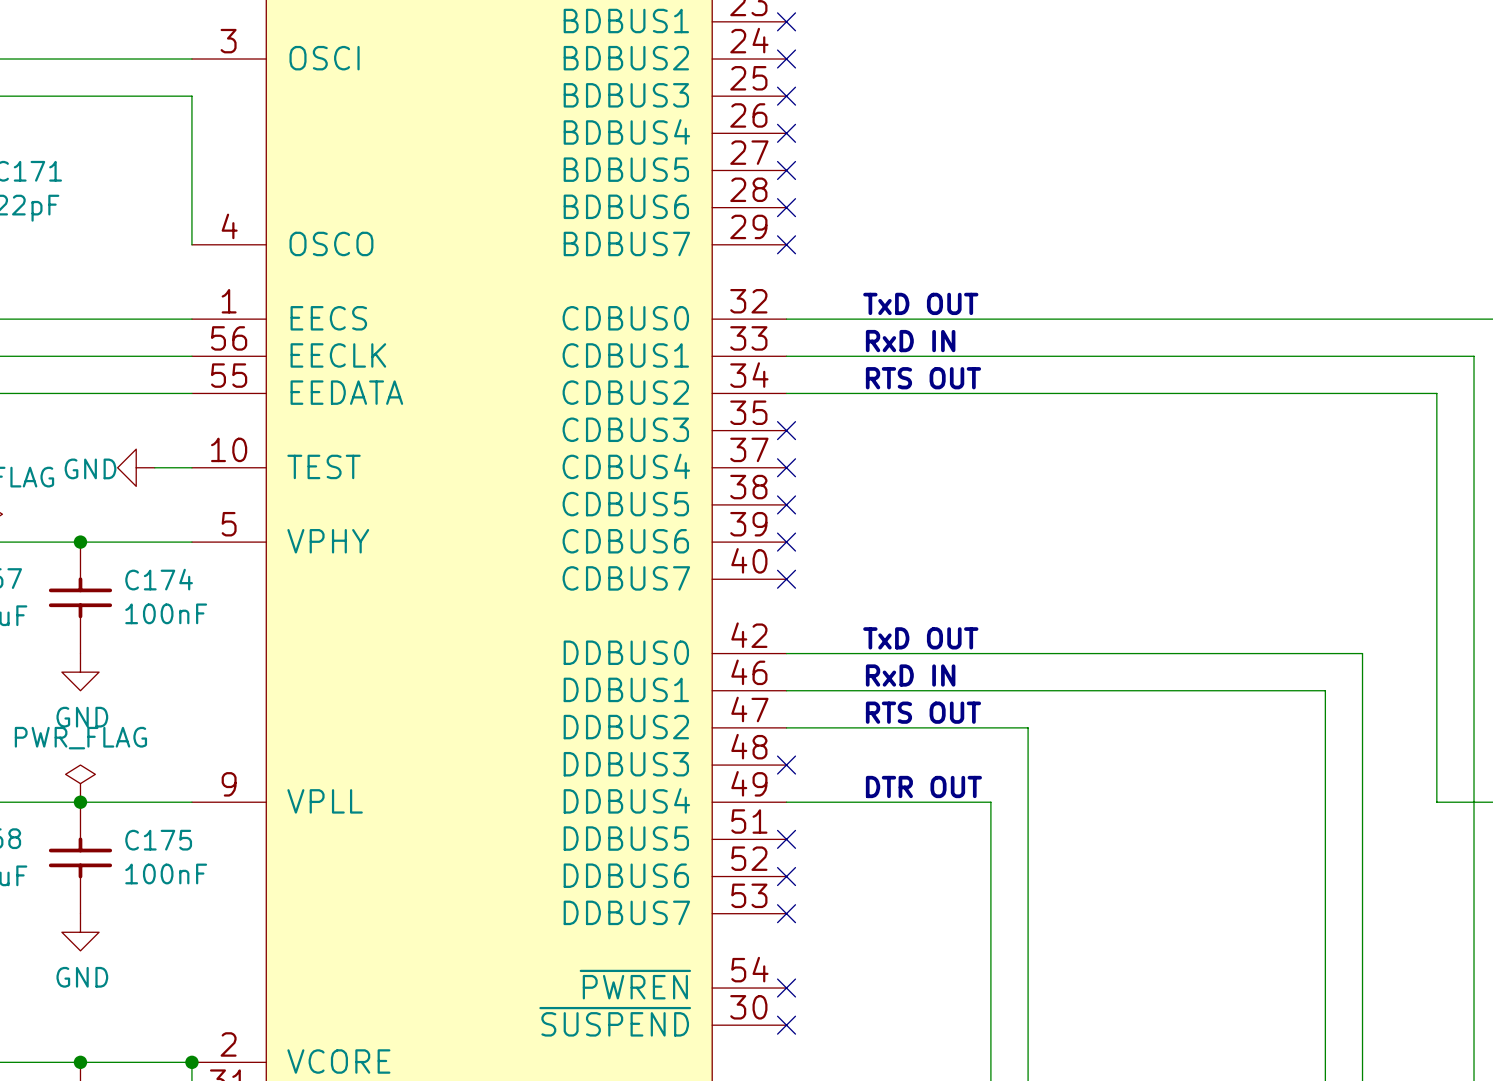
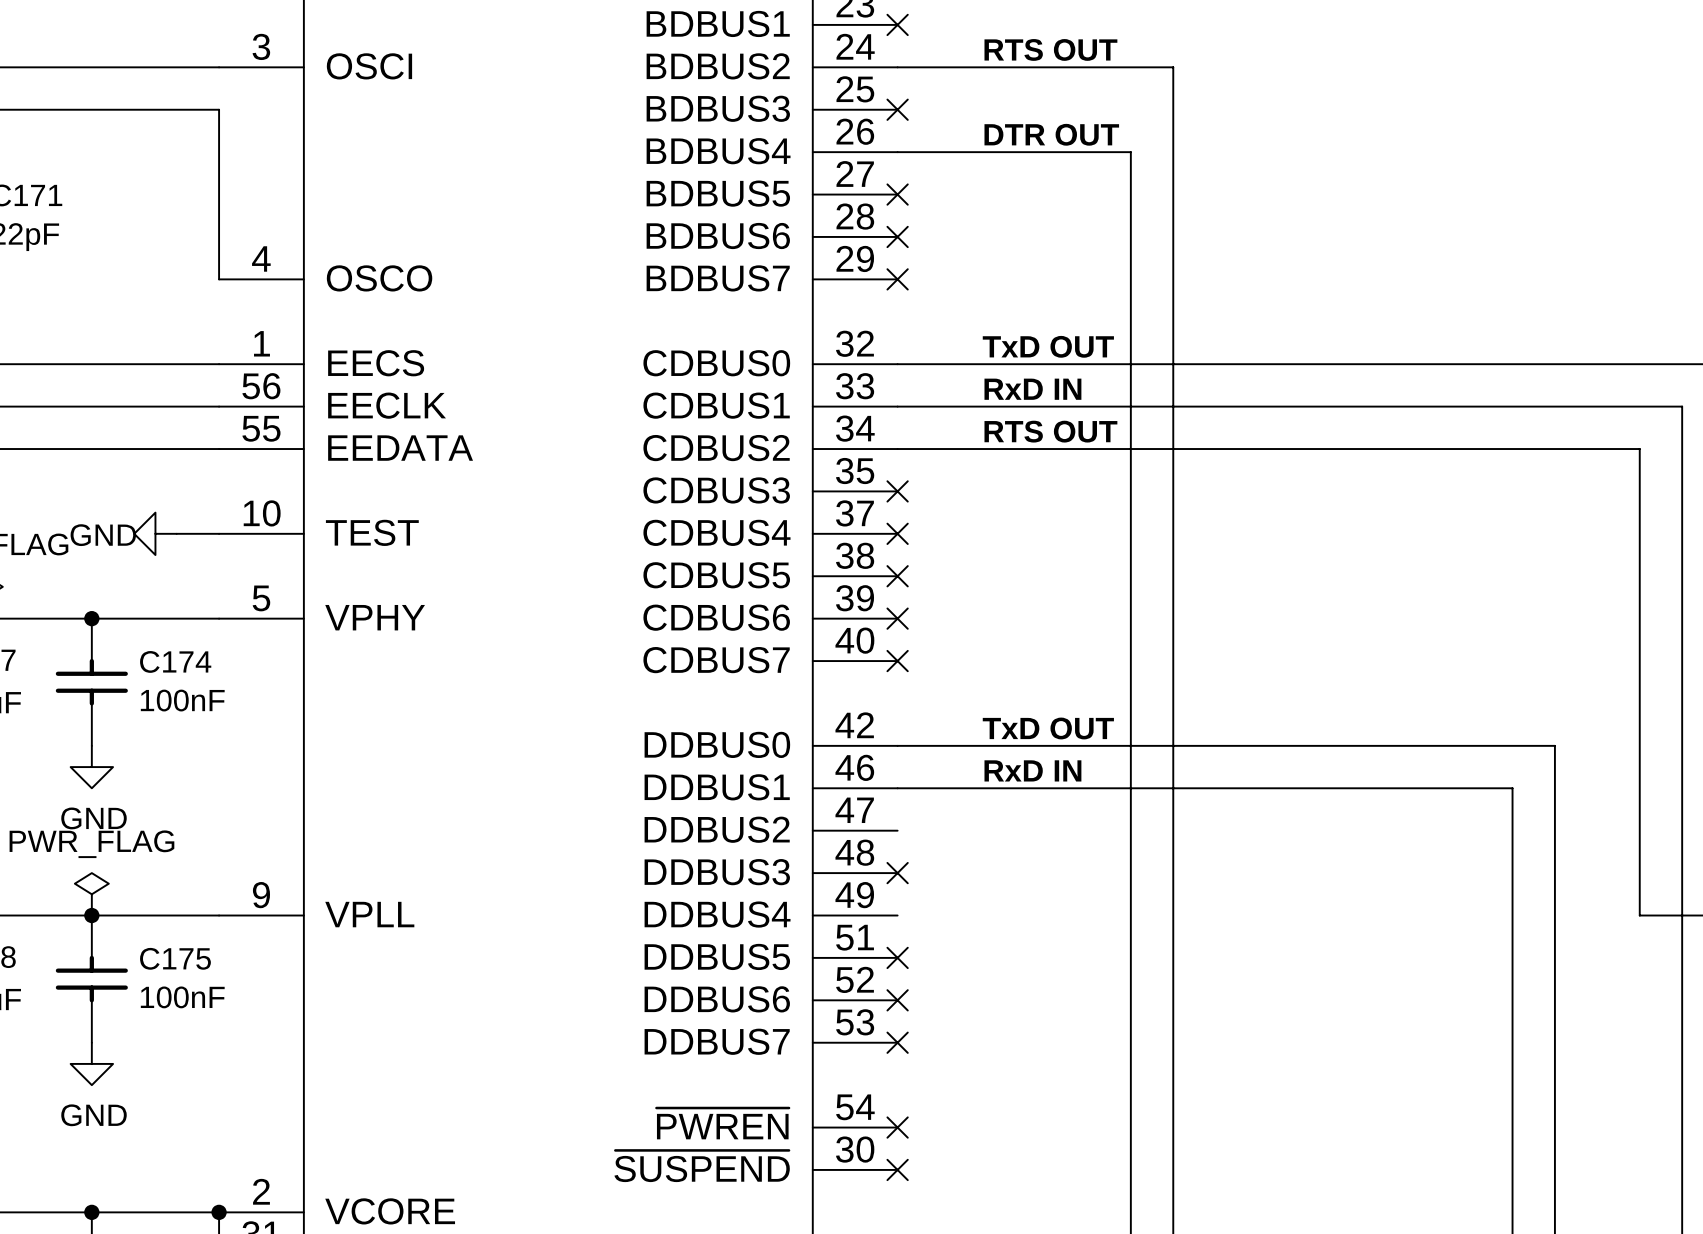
text: none -> RTS OUT (1050, 49)
no-connect mark: (786, 59) -> none
text: none -> DTR OUT (1051, 134)
no-connect mark: (786, 133) -> none
text: RTS OUT (923, 712) -> none
wire: (786, 727) (1028, 727) -> (897, 67) (1173, 67) (1173, 830)
text: DTR OUT (923, 786) -> none
wire: (786, 802) (990, 802) -> (897, 152) (1130, 152) (1130, 915)

